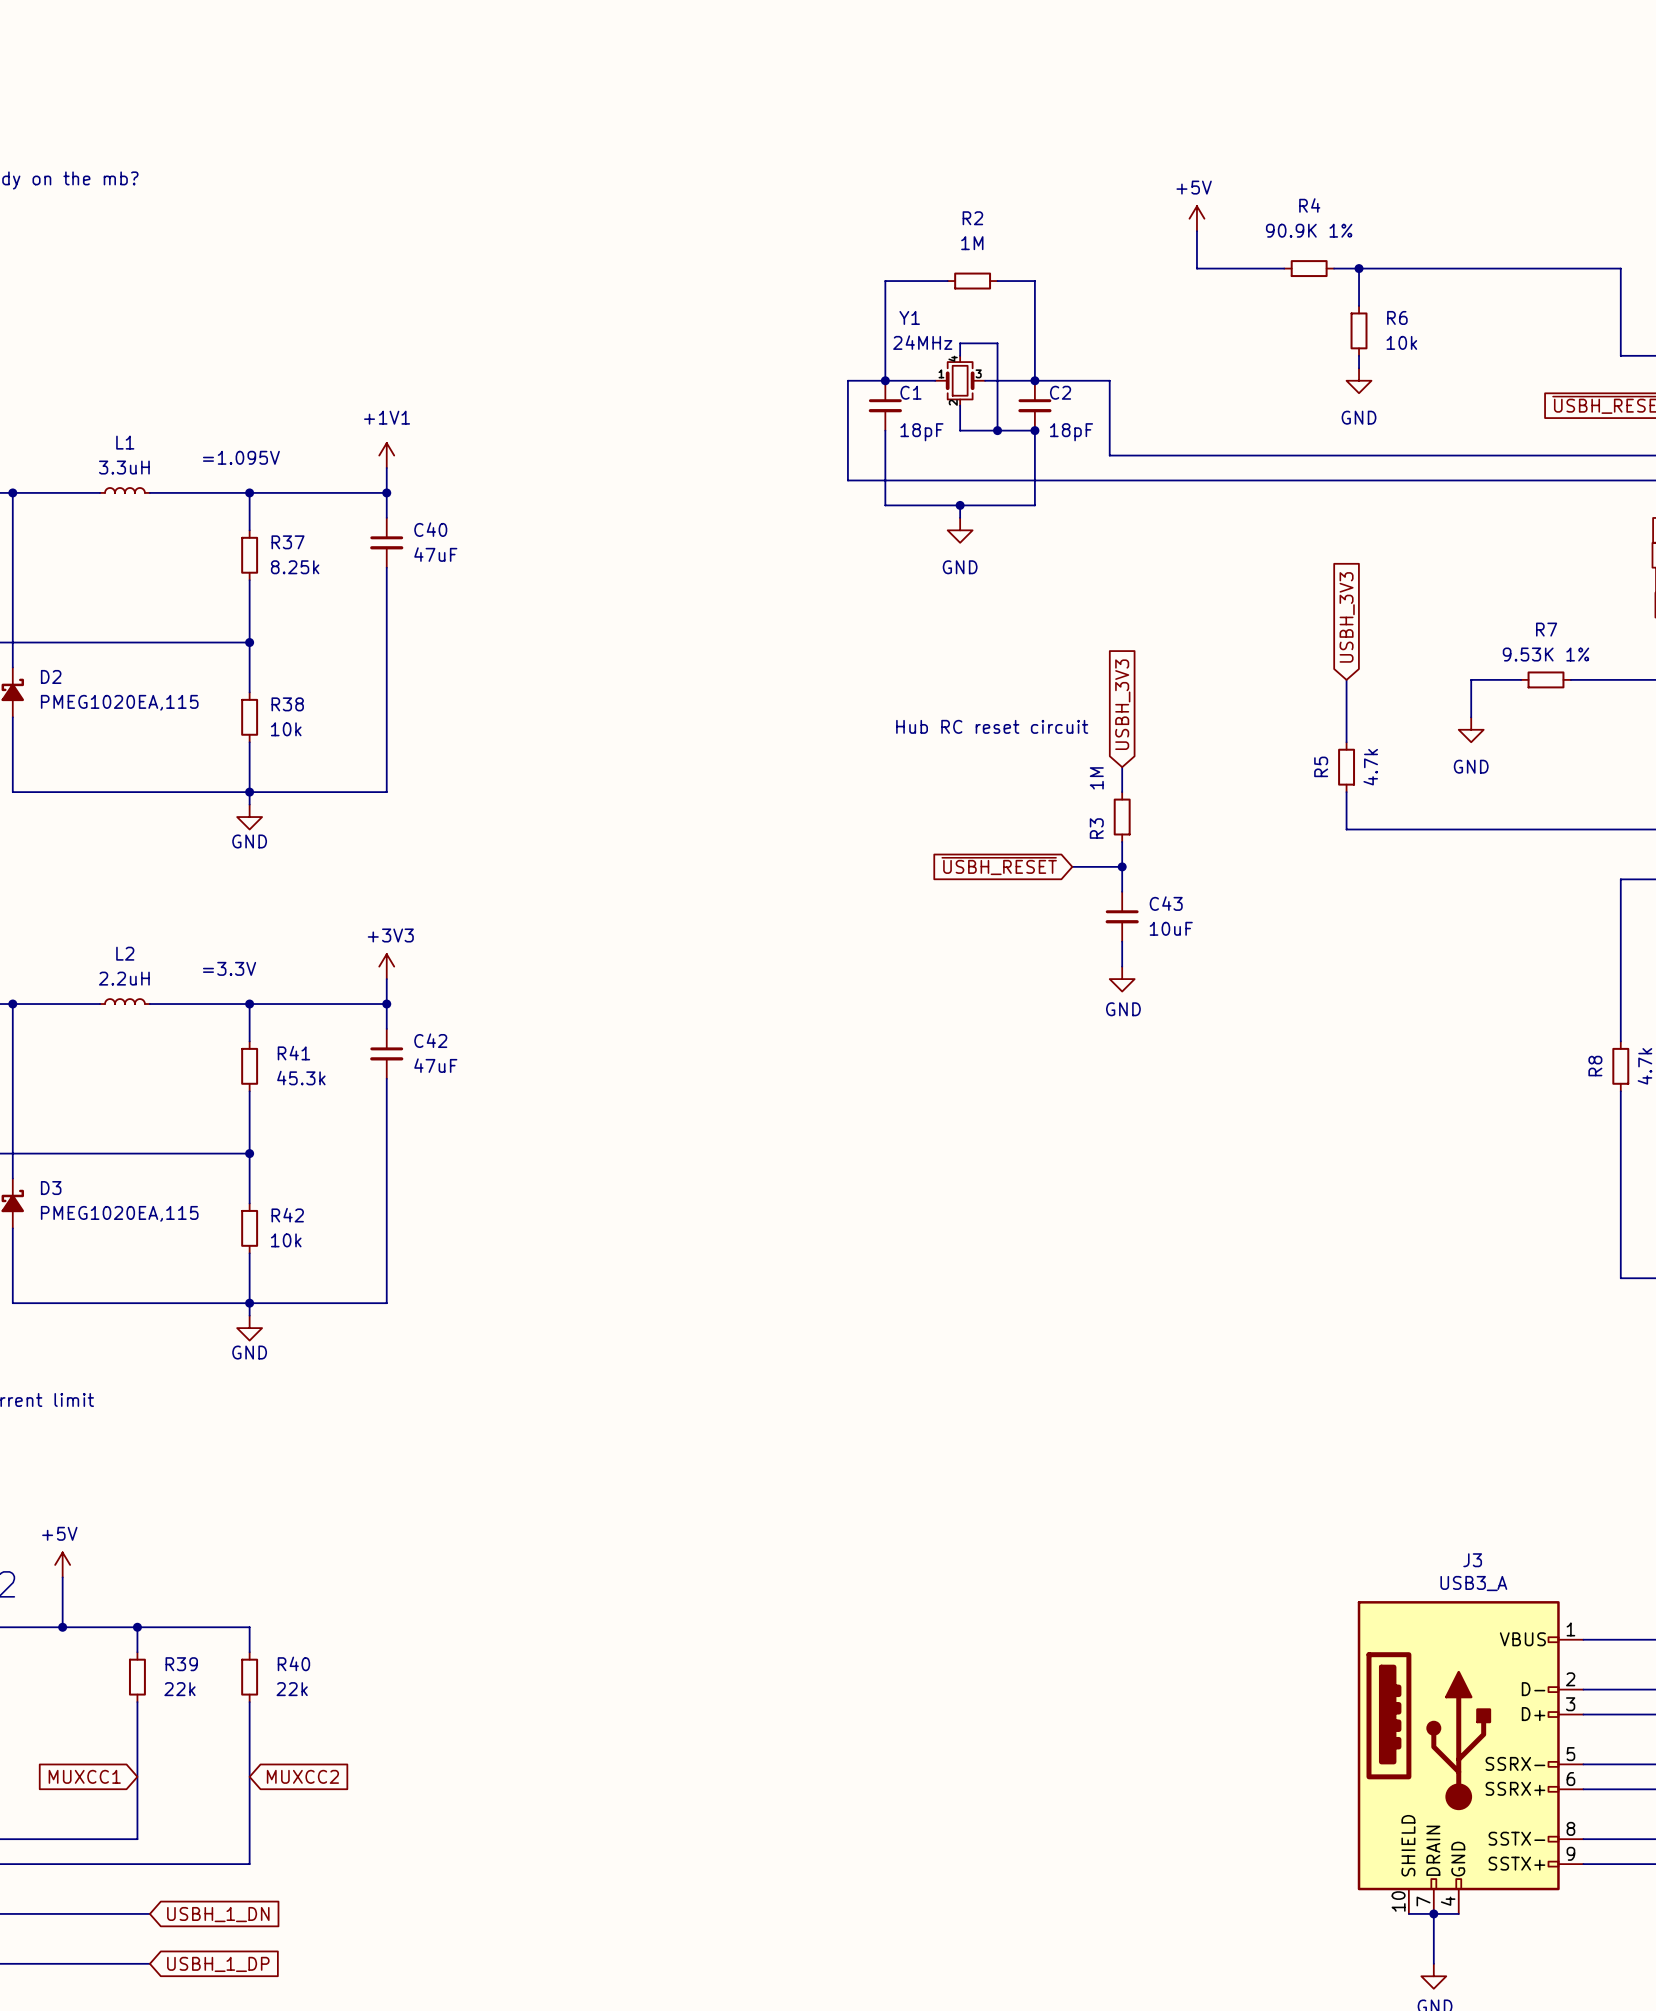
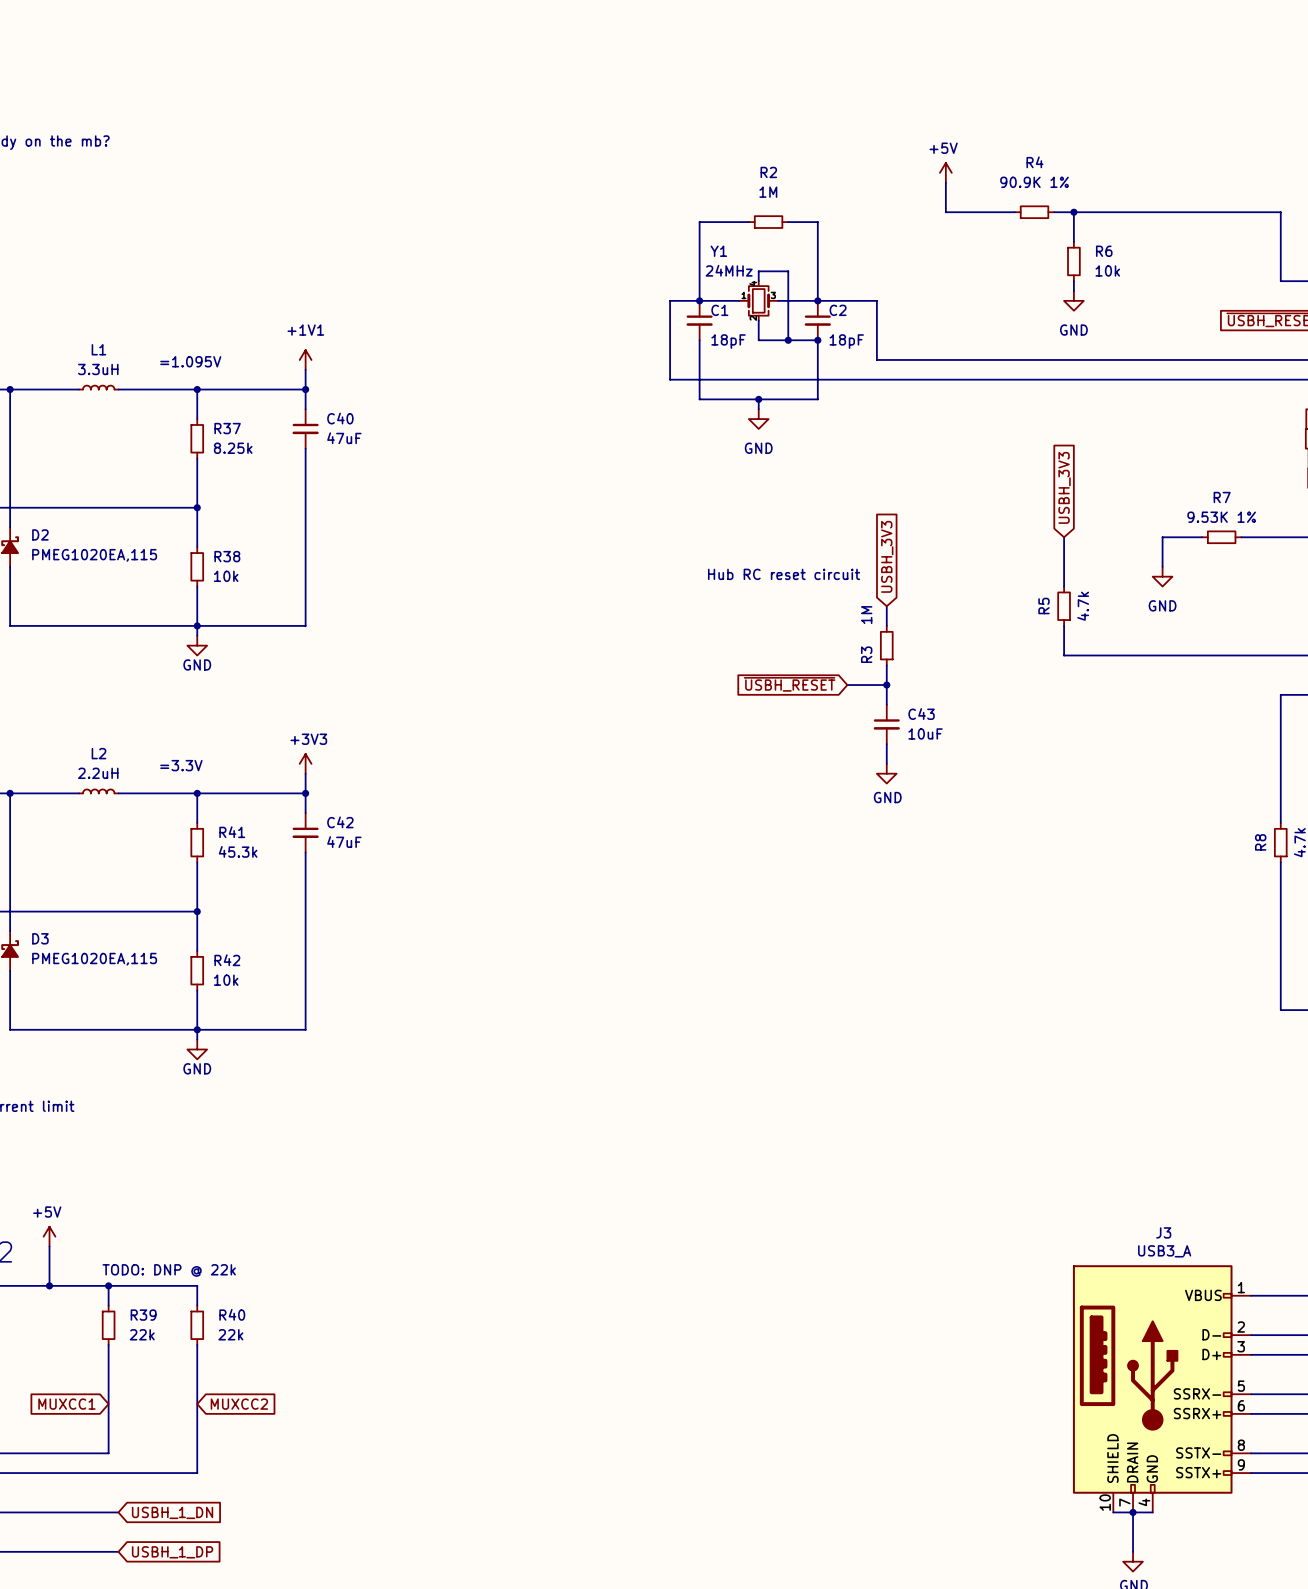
text: none -> TODO: DNP @ 22k (169, 1270)

